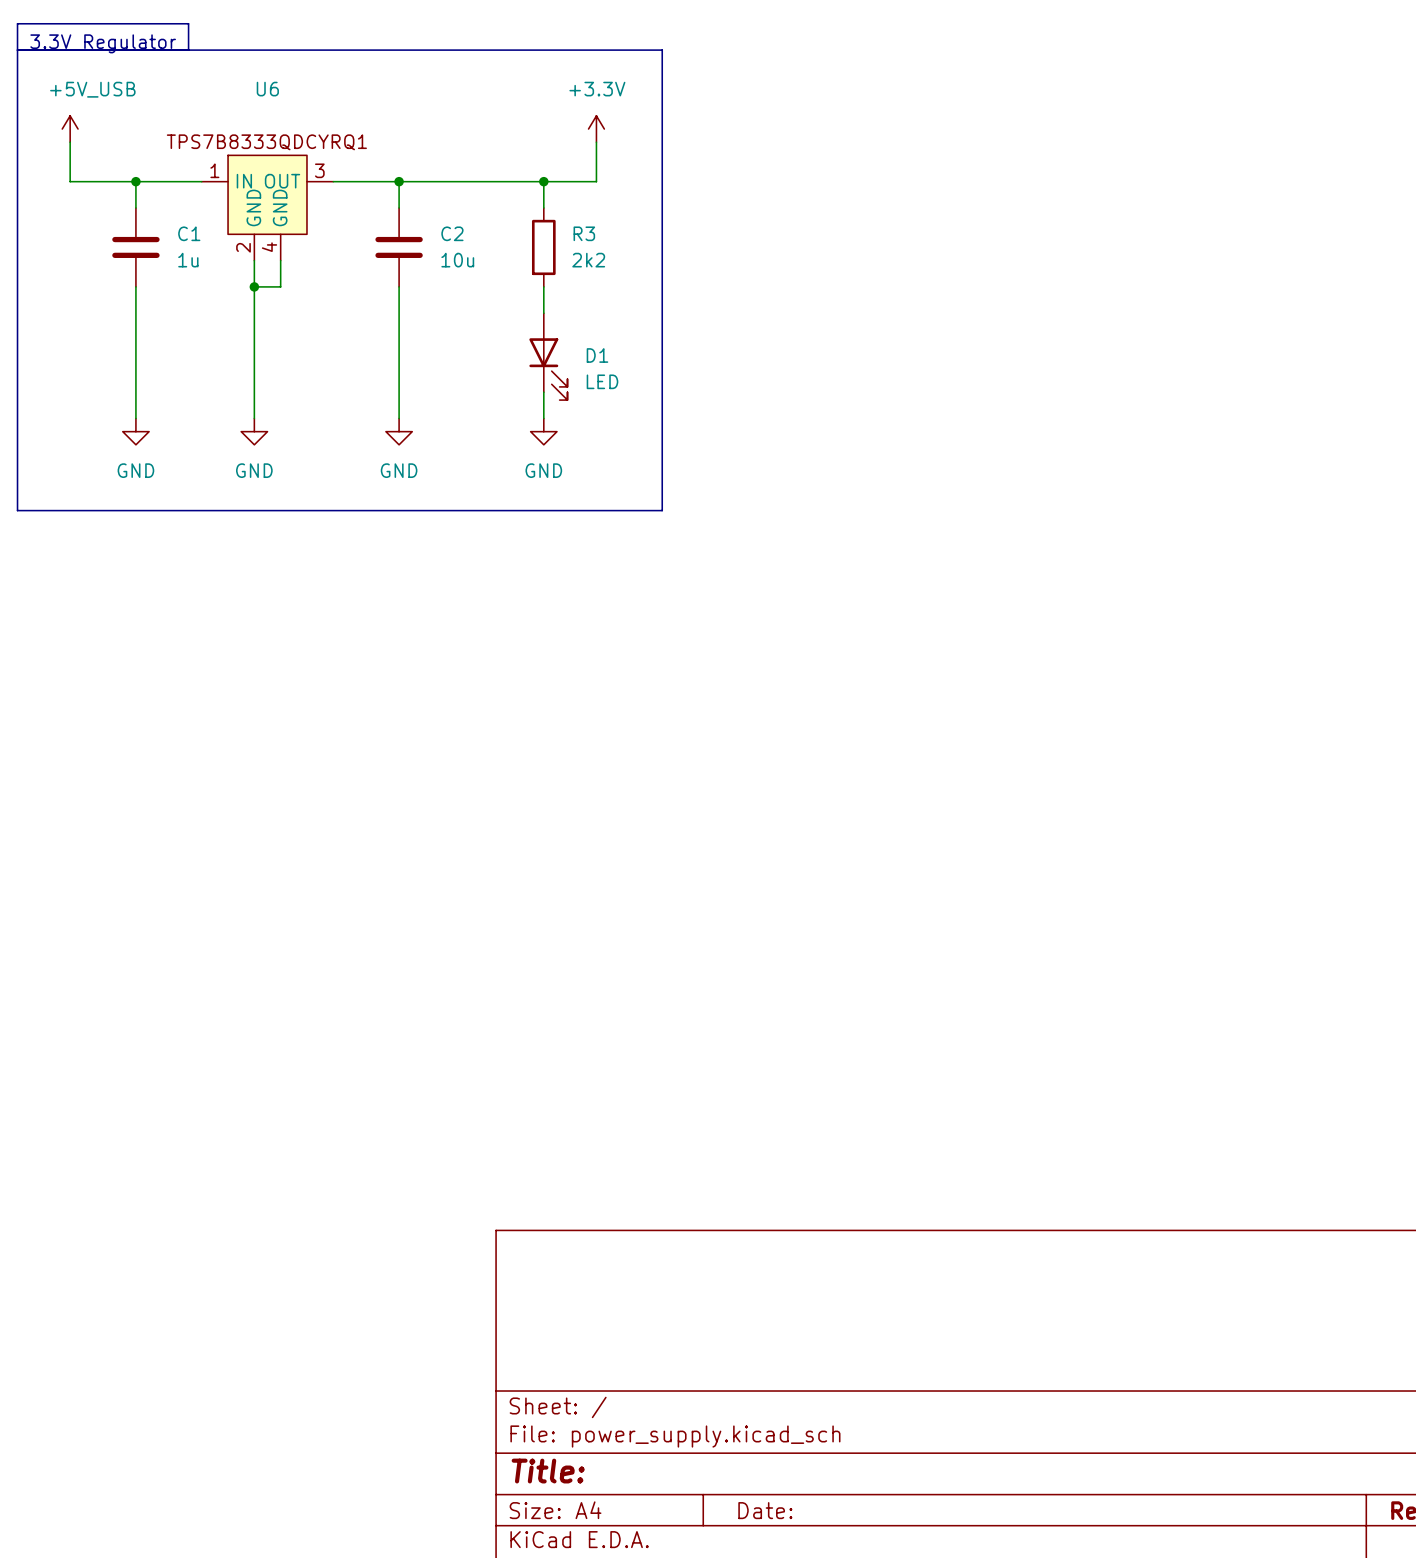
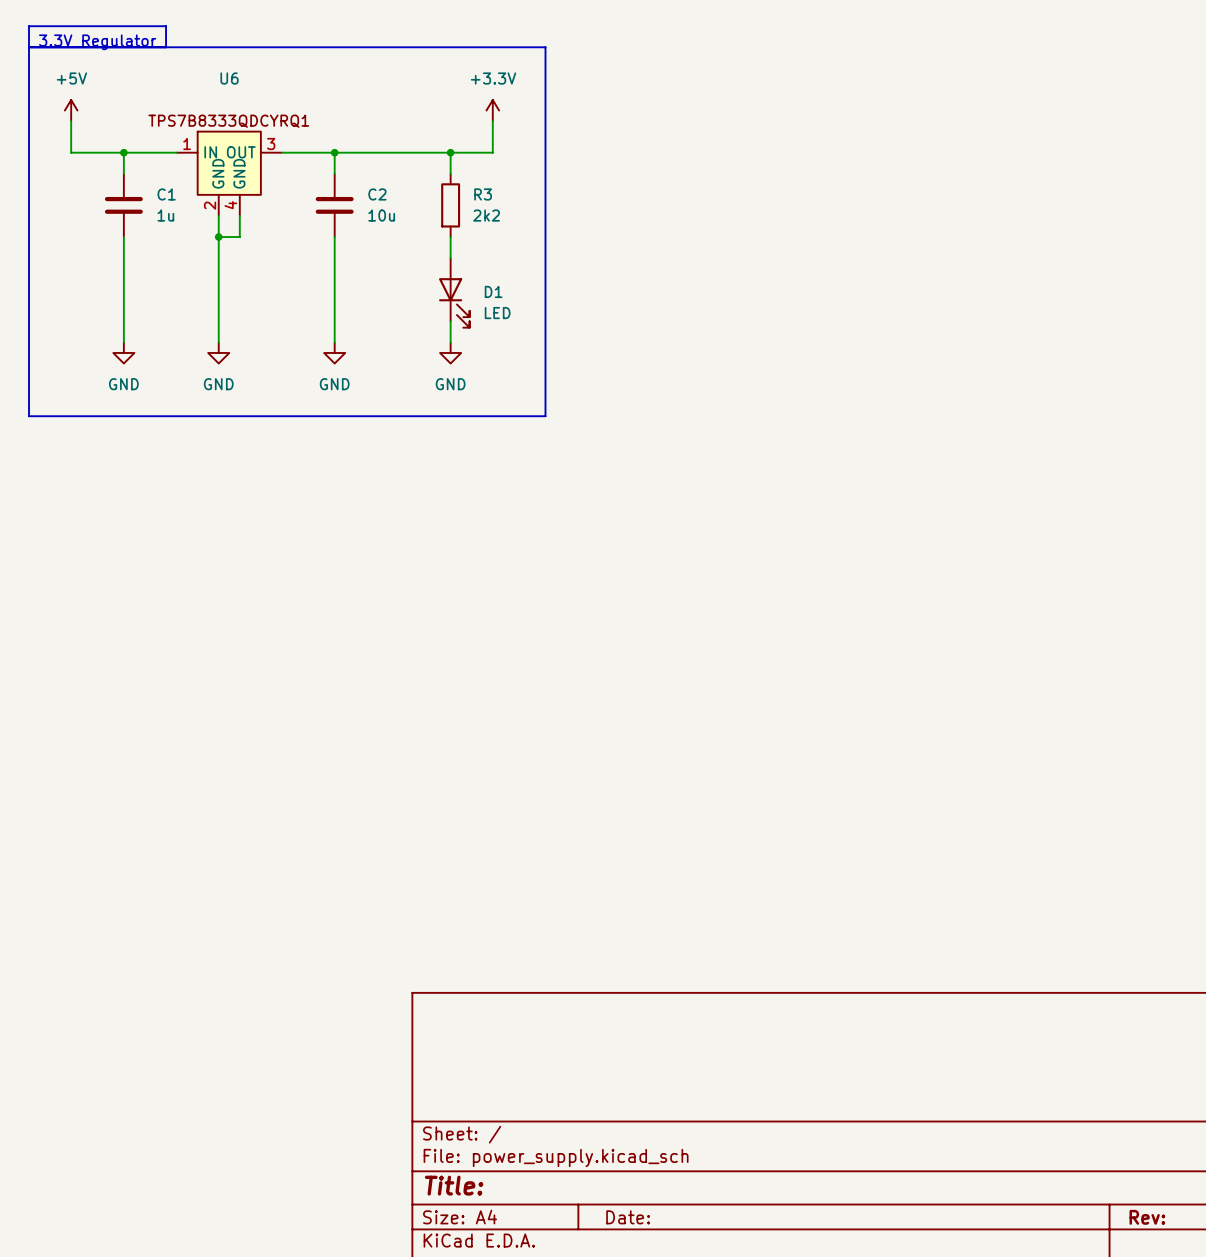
power symbol: none -> +5V (71, 110)
power symbol: +5V_USB (92, 129) -> none

